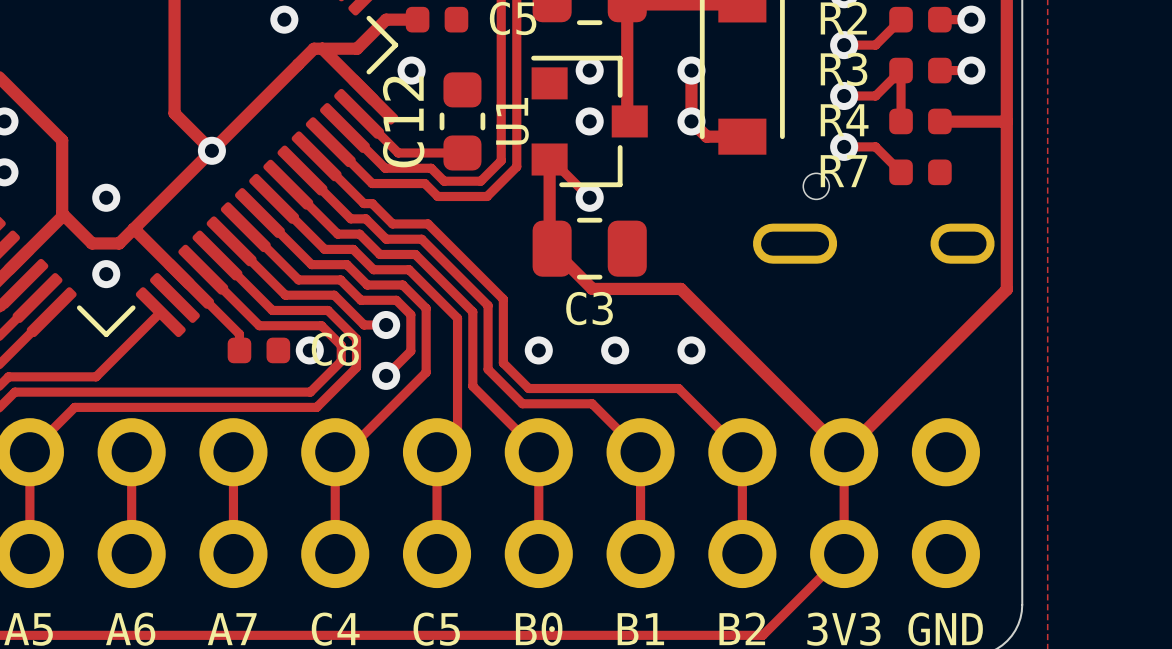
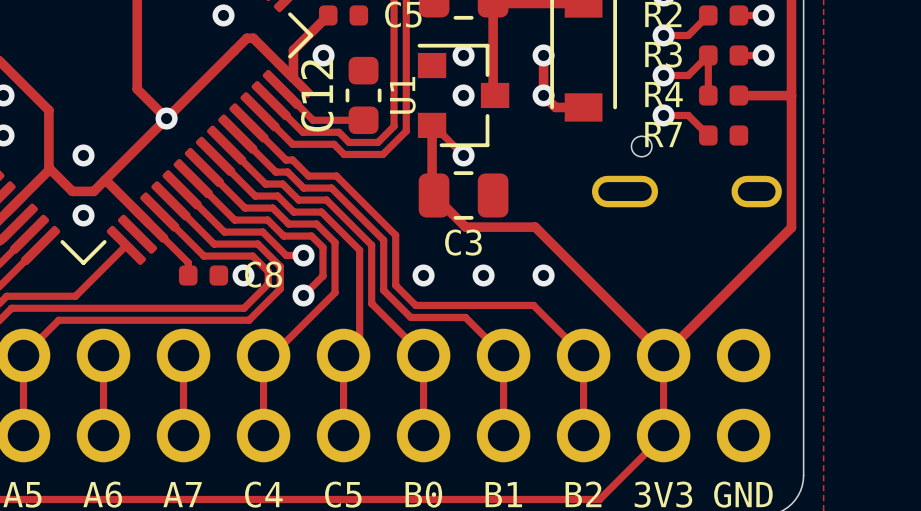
track: (417, 19) (386, 19) (357, 48) (322, 48) -> (328, 15) (293, 50) (293, 78)

